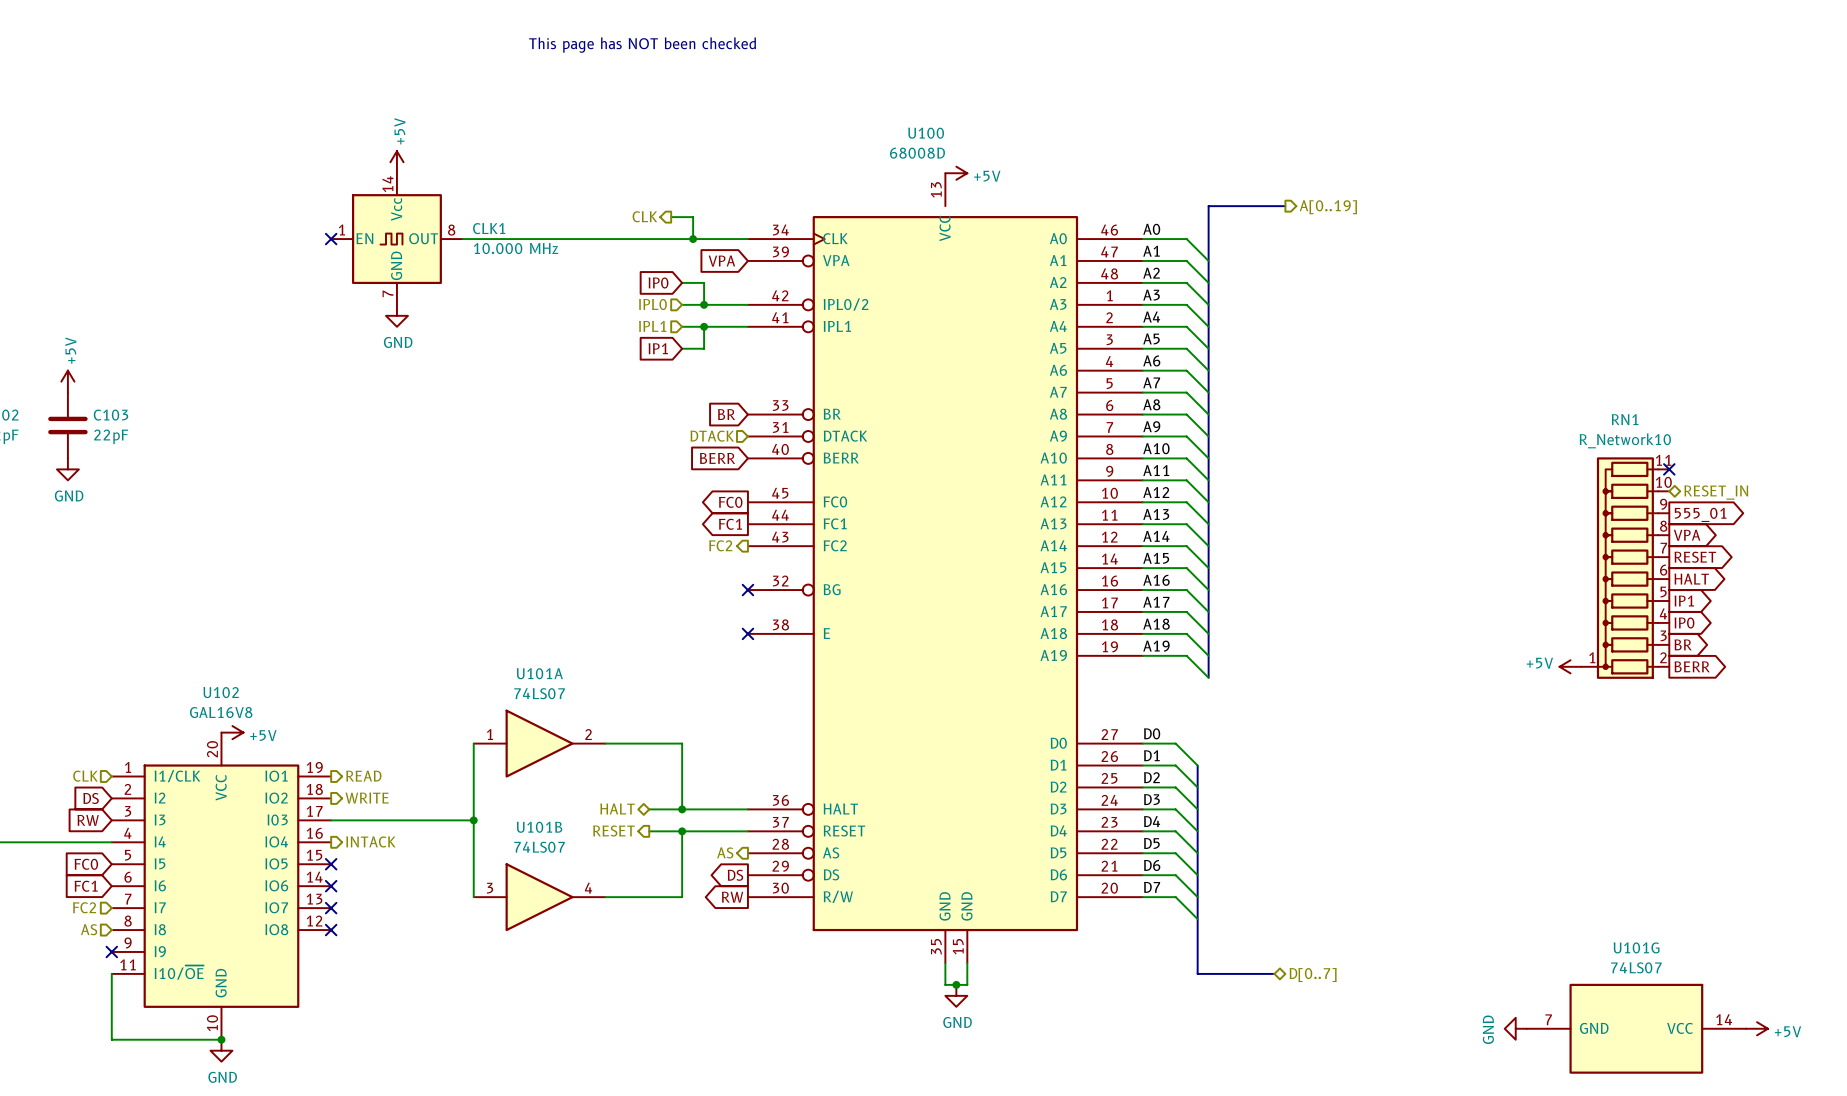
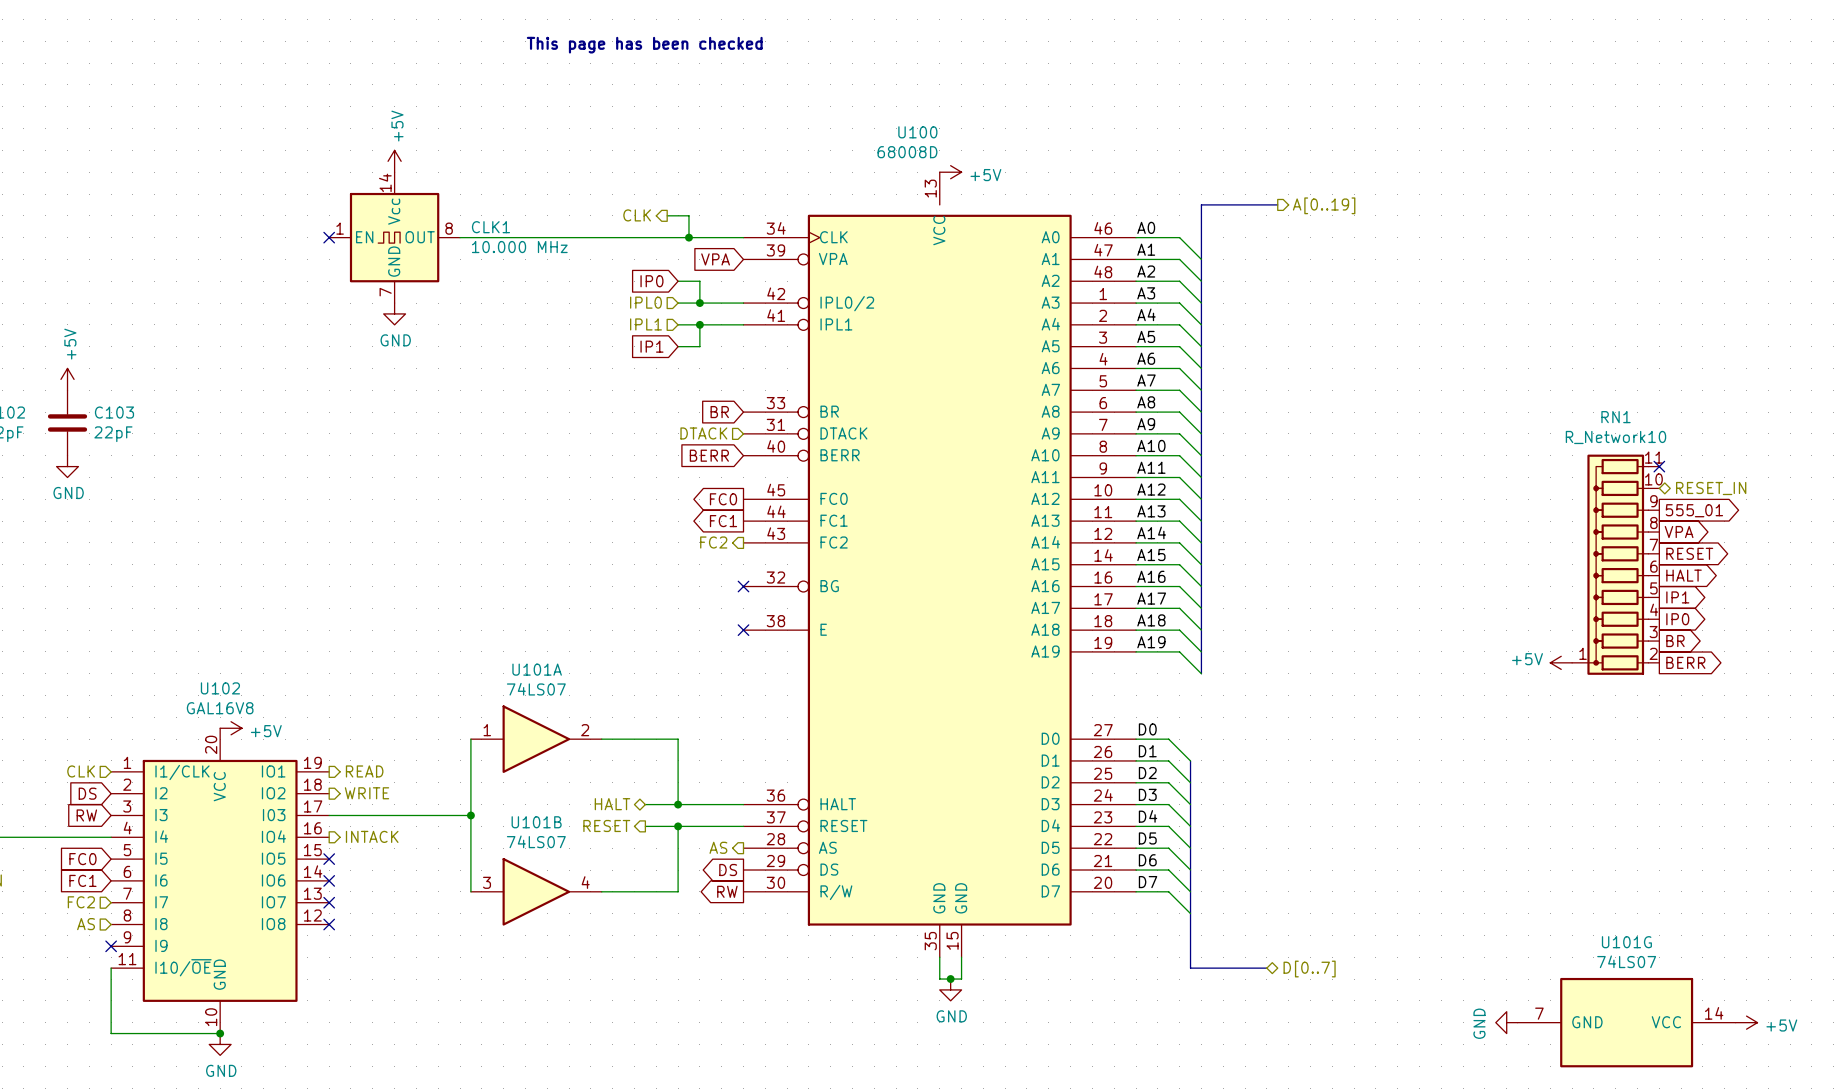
text: This page has NOT been checked (642, 45) -> This page has been checked (644, 45)

